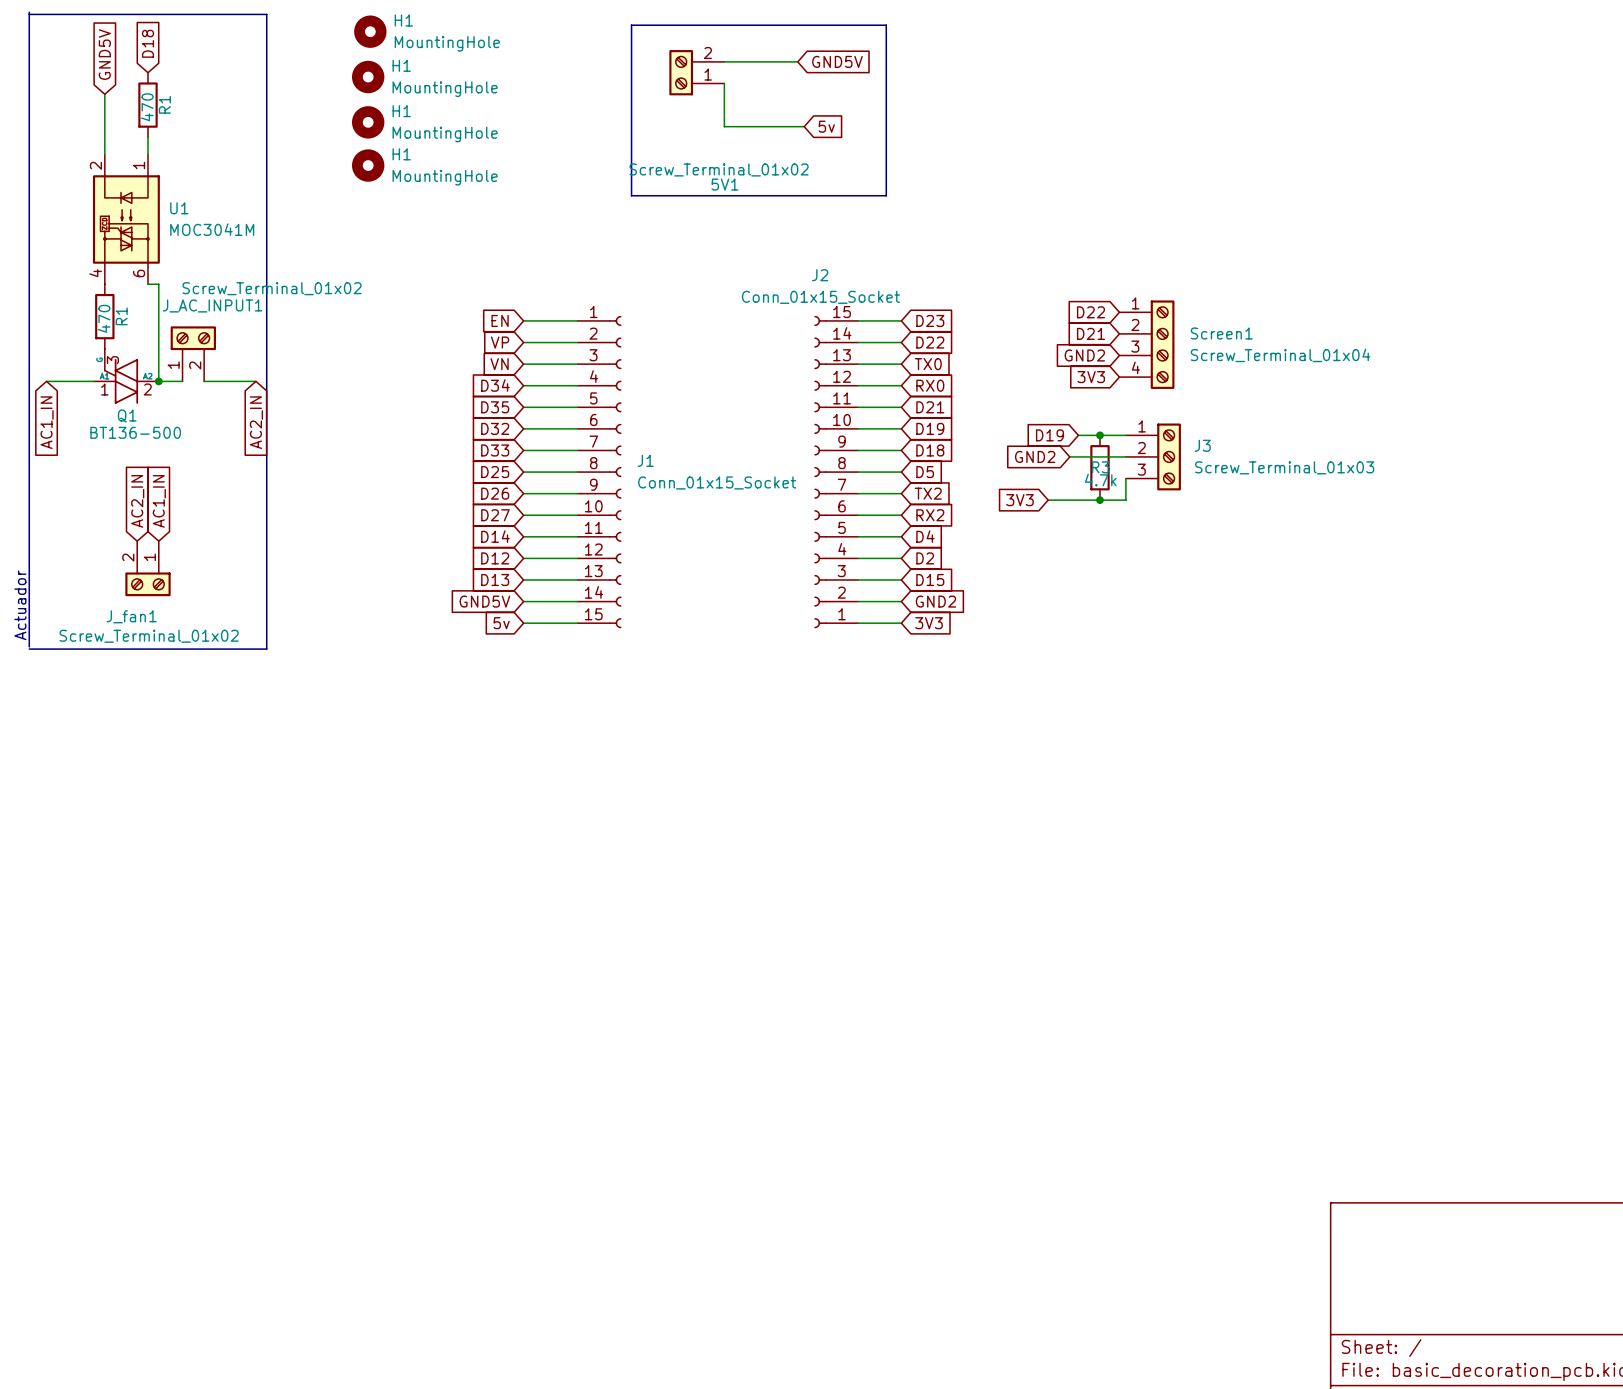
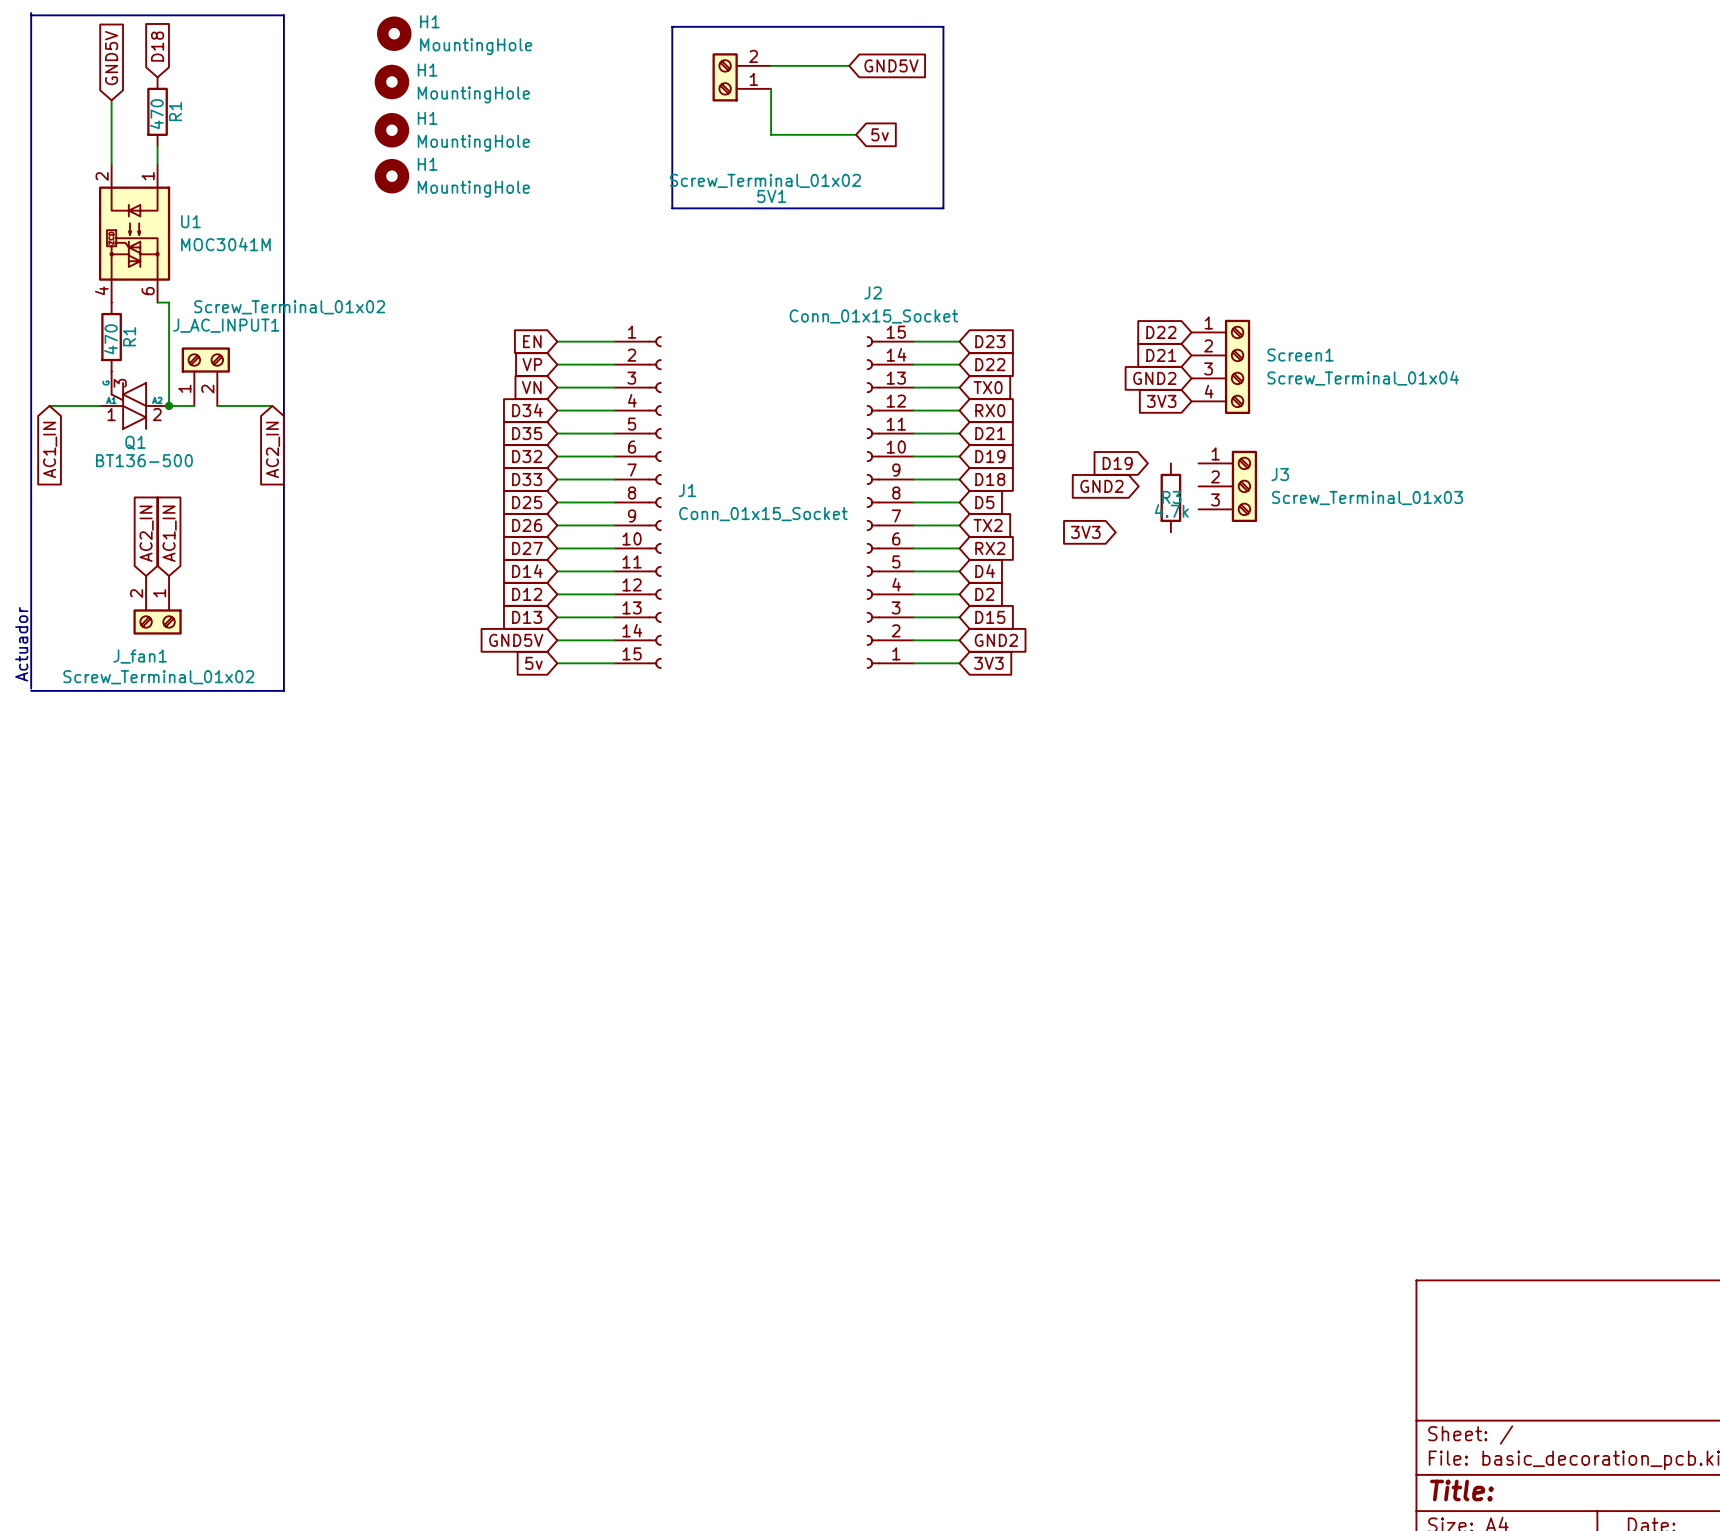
wire: (1078, 435) (1125, 435) -> none
junction: (1099, 435) -> none
wire: (1069, 456) (1125, 456) -> none
wire: (1125, 478) (1125, 500) (1048, 500) -> none
junction: (1099, 500) -> none

